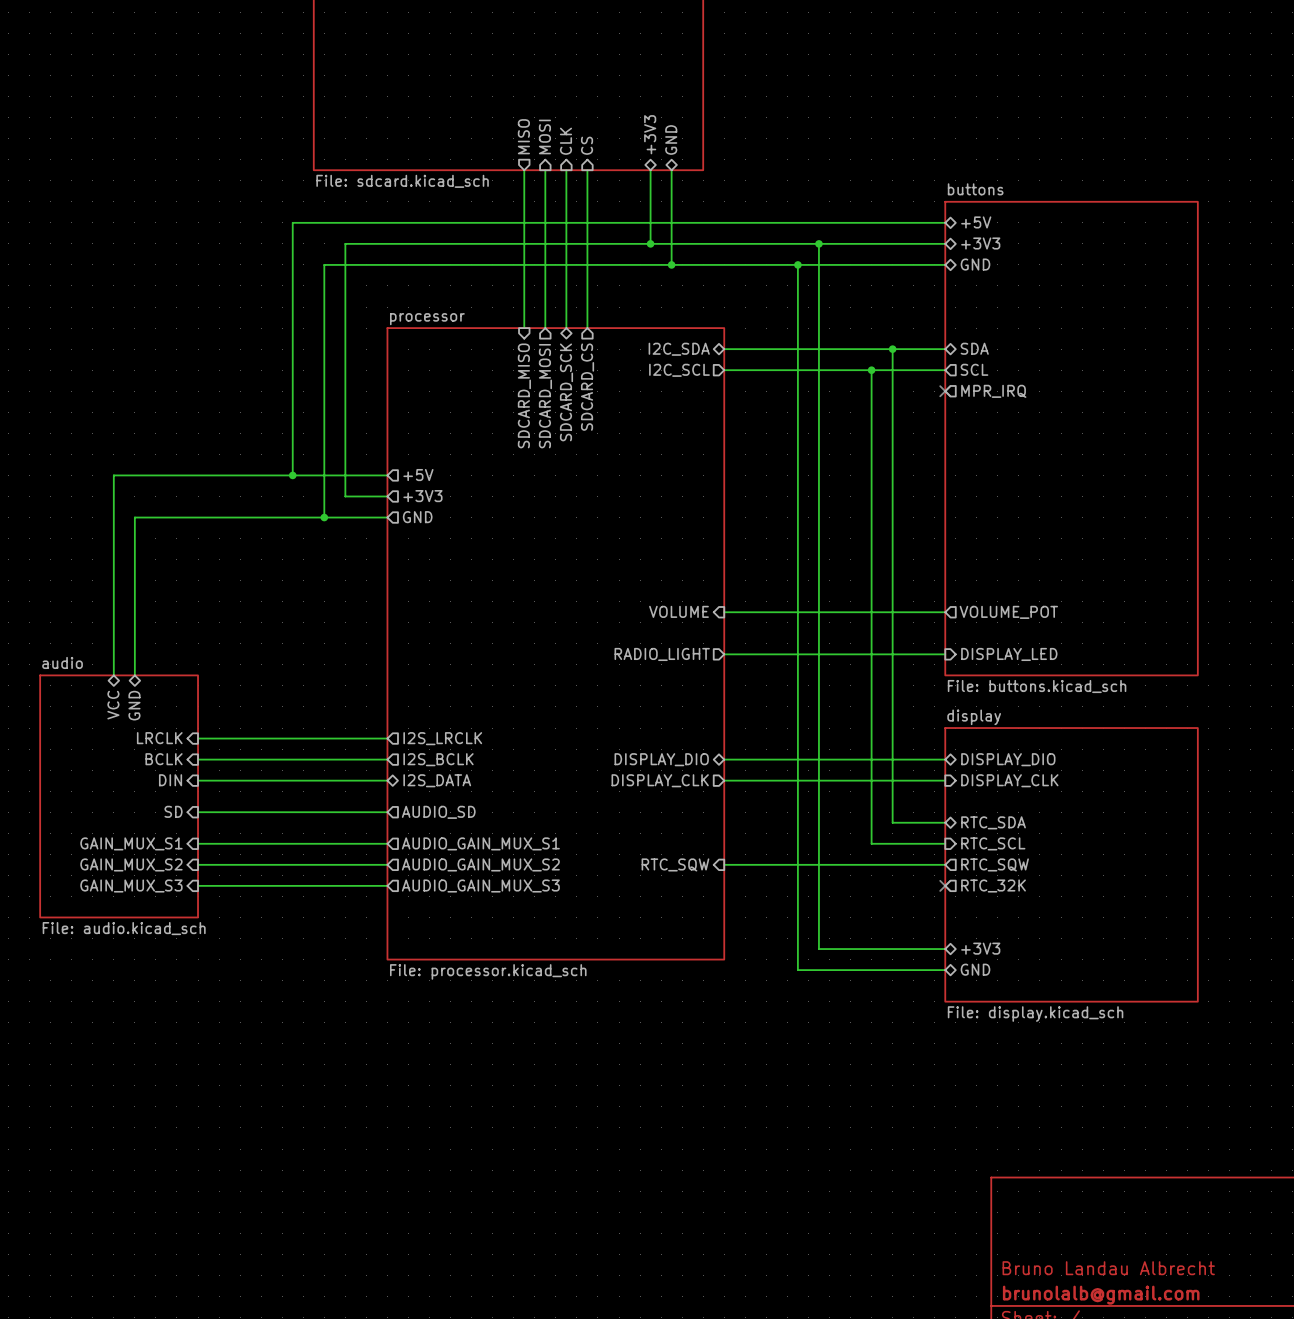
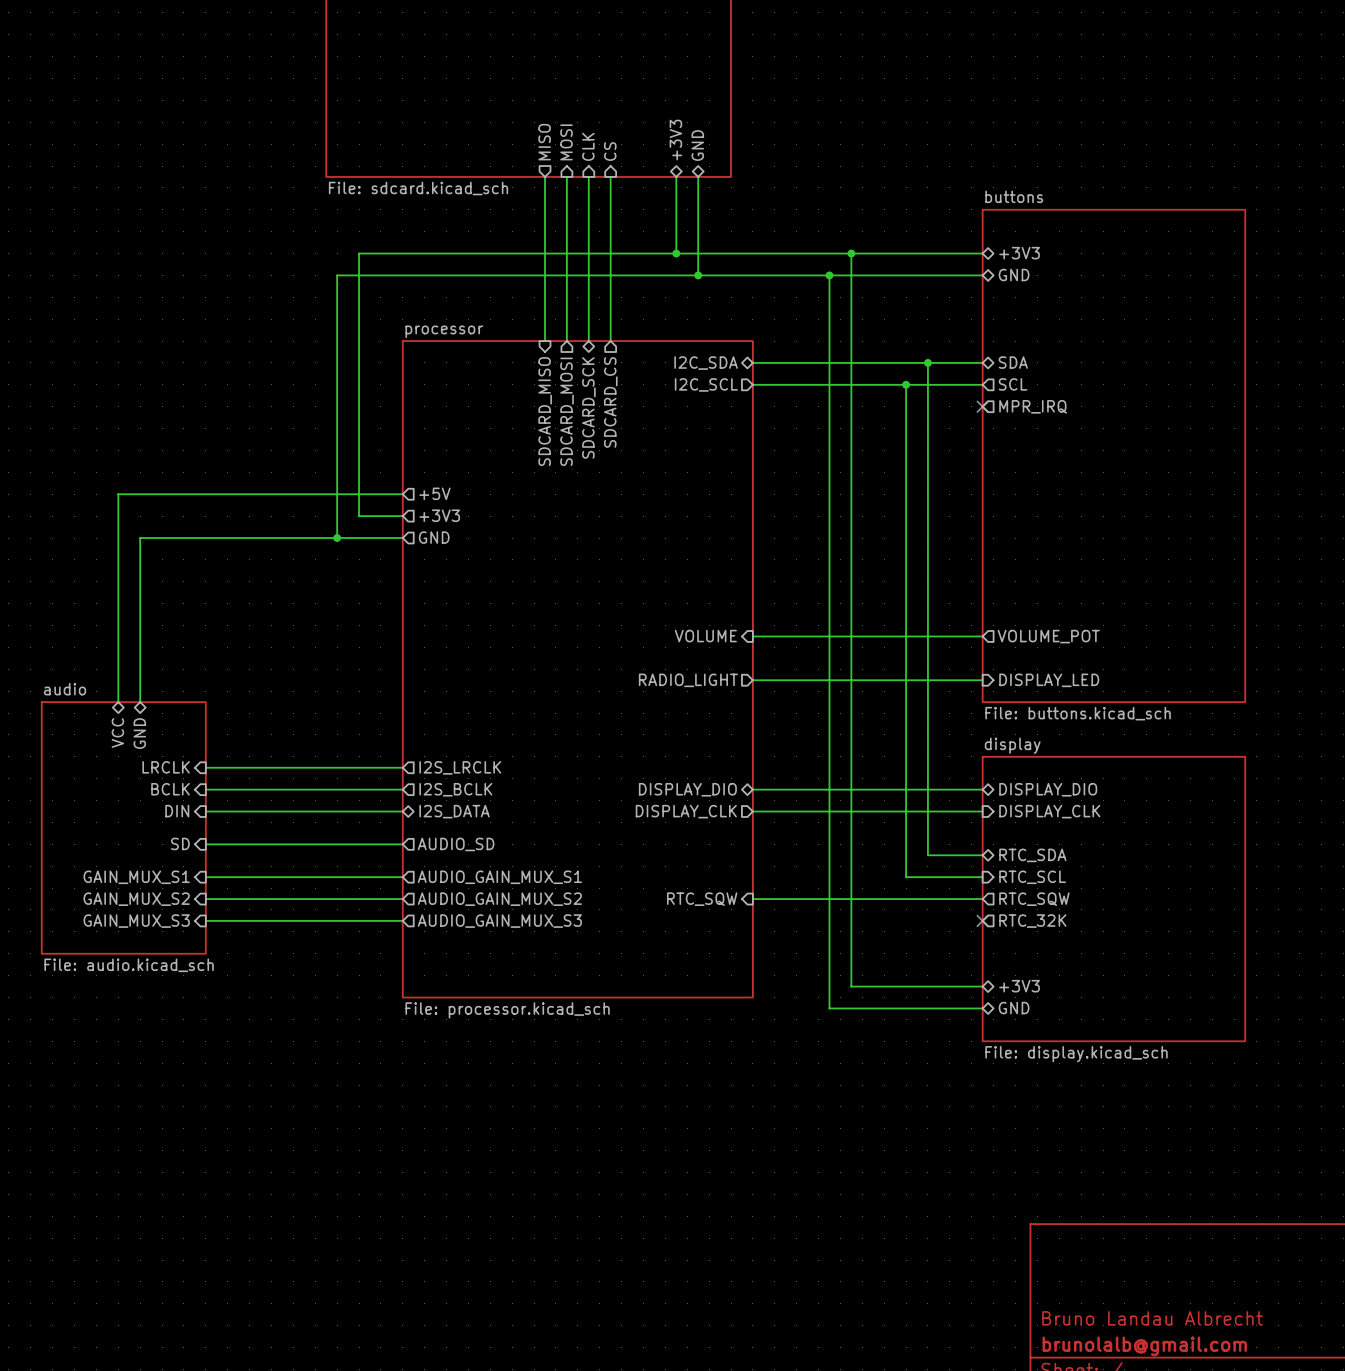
wire: (945, 222) (292, 222) (292, 475) -> none
sheet pin: +5V (976, 222) -> none
junction: (292, 475) -> none

